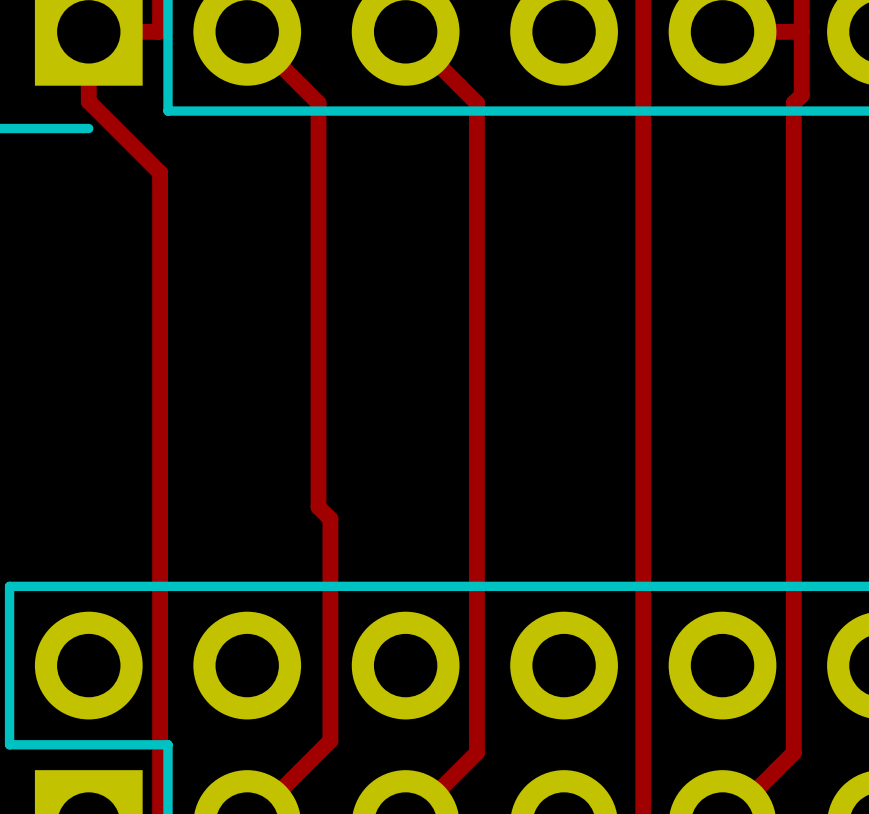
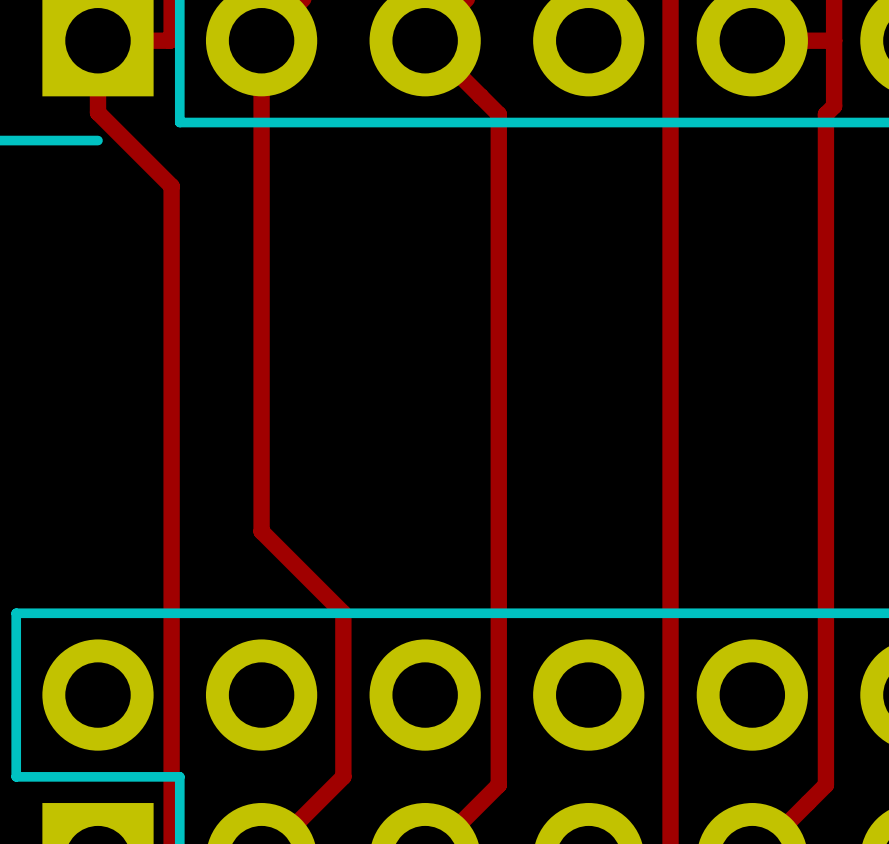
track: (247, 31) (318, 103) (318, 507) (330, 519) (330, 740) (326, 744) -> (261, 40) (261, 531) (343, 613) (343, 776)

